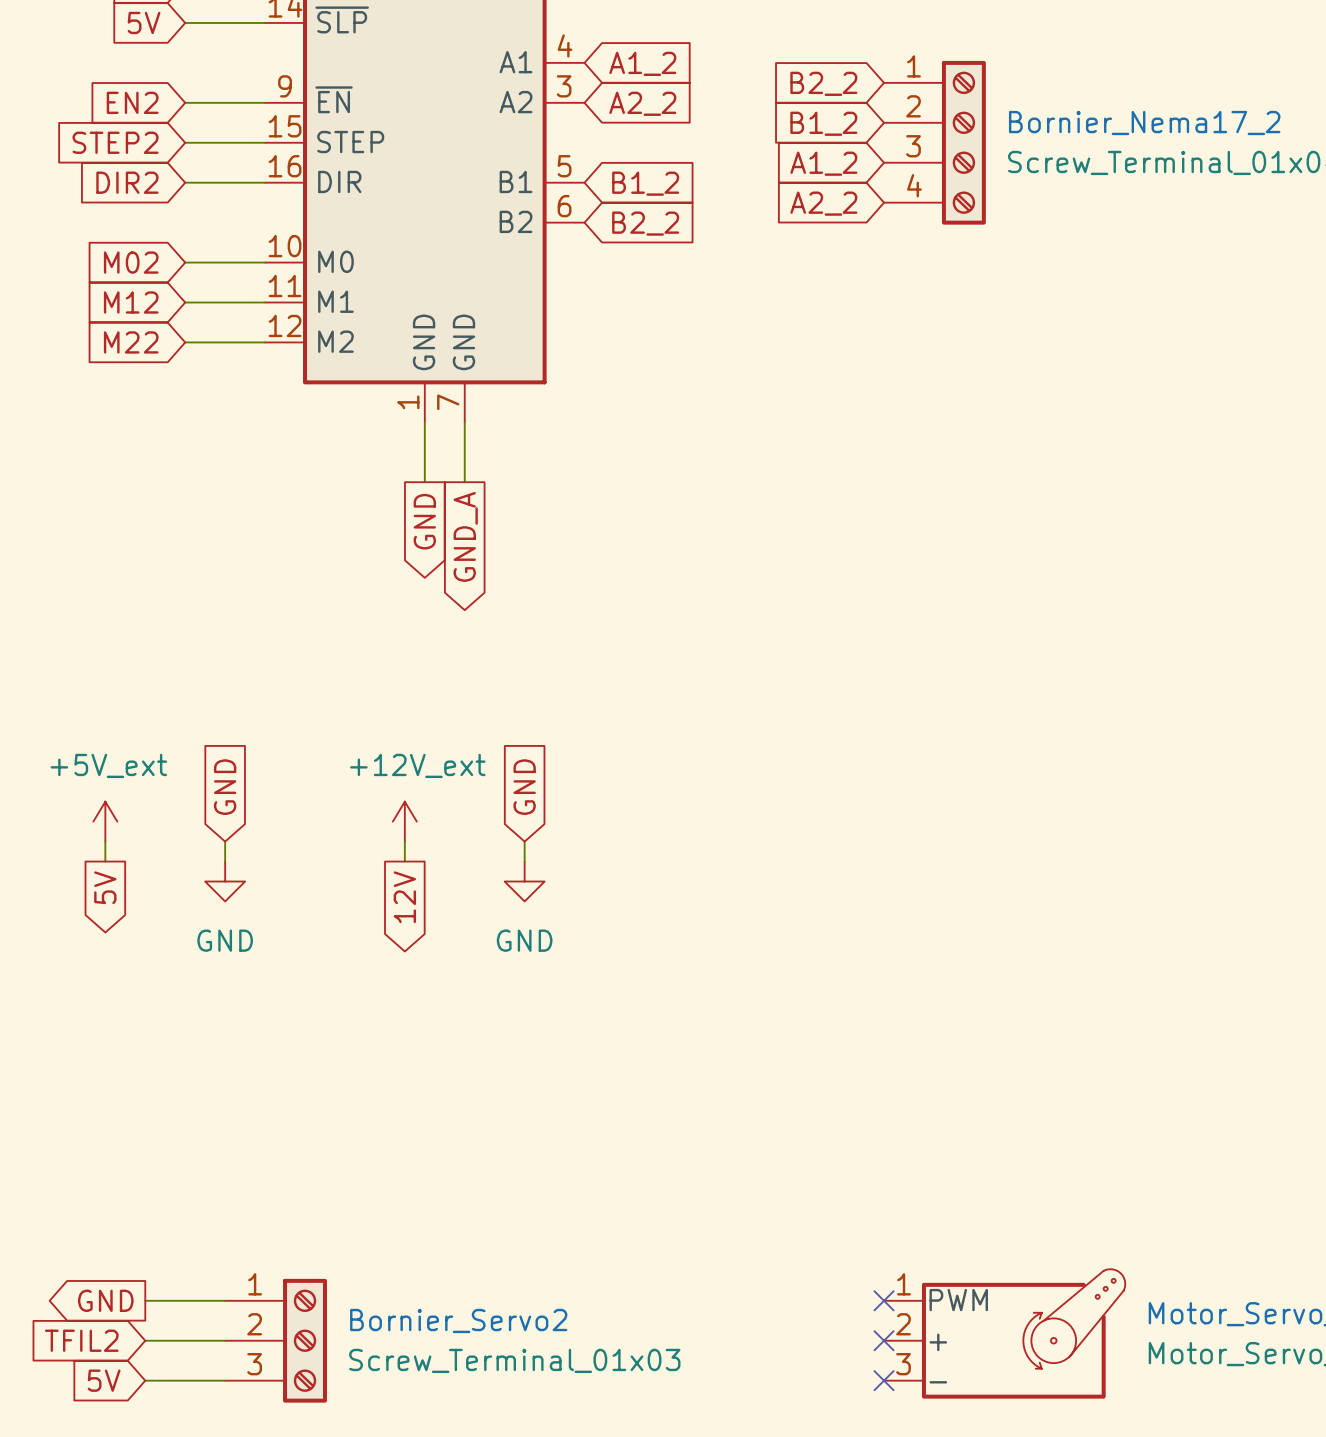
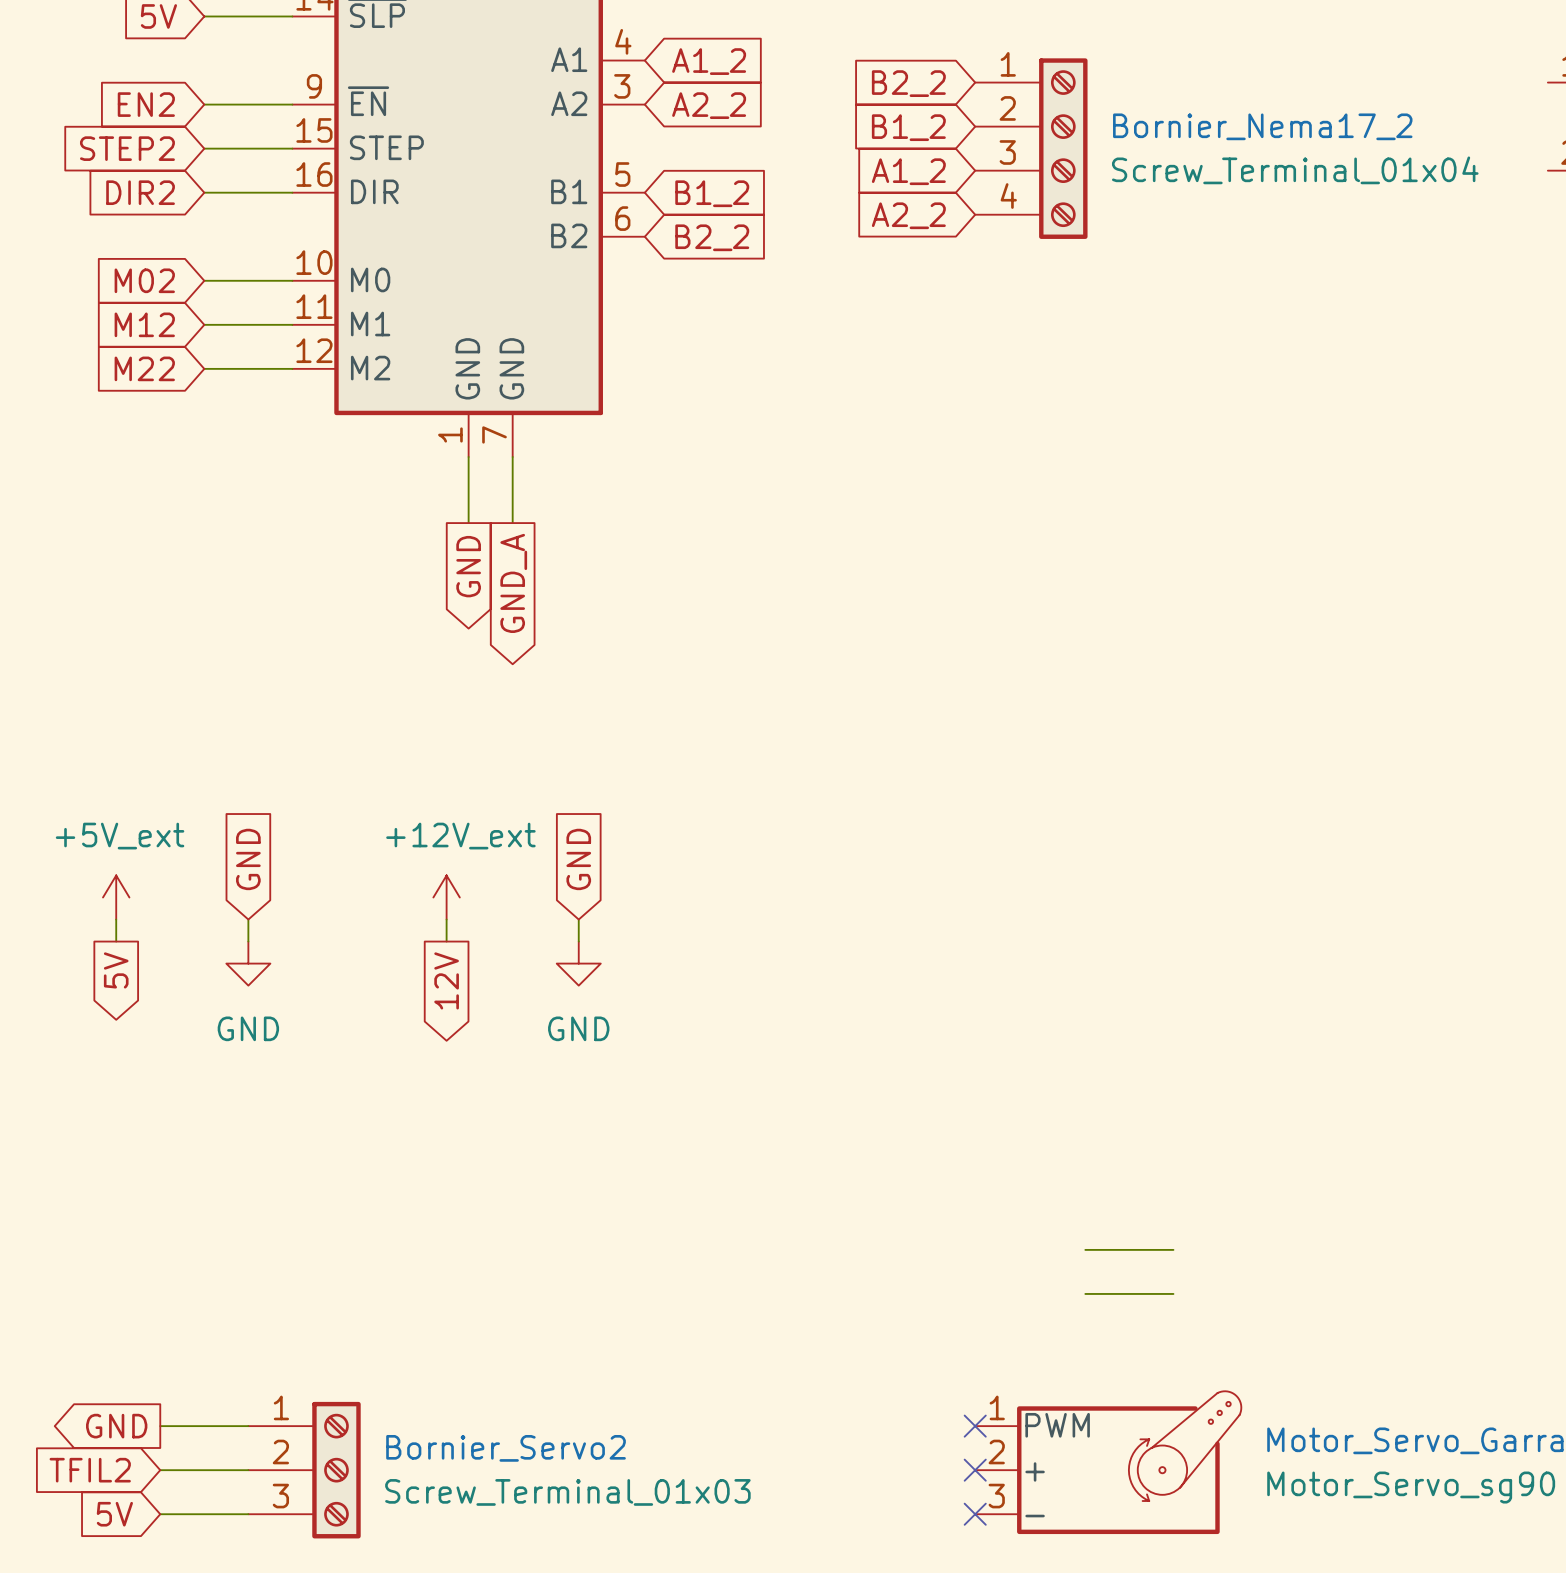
wire: none -> (1085, 1249) (1173, 1249)
wire: none -> (1085, 1293) (1173, 1293)

